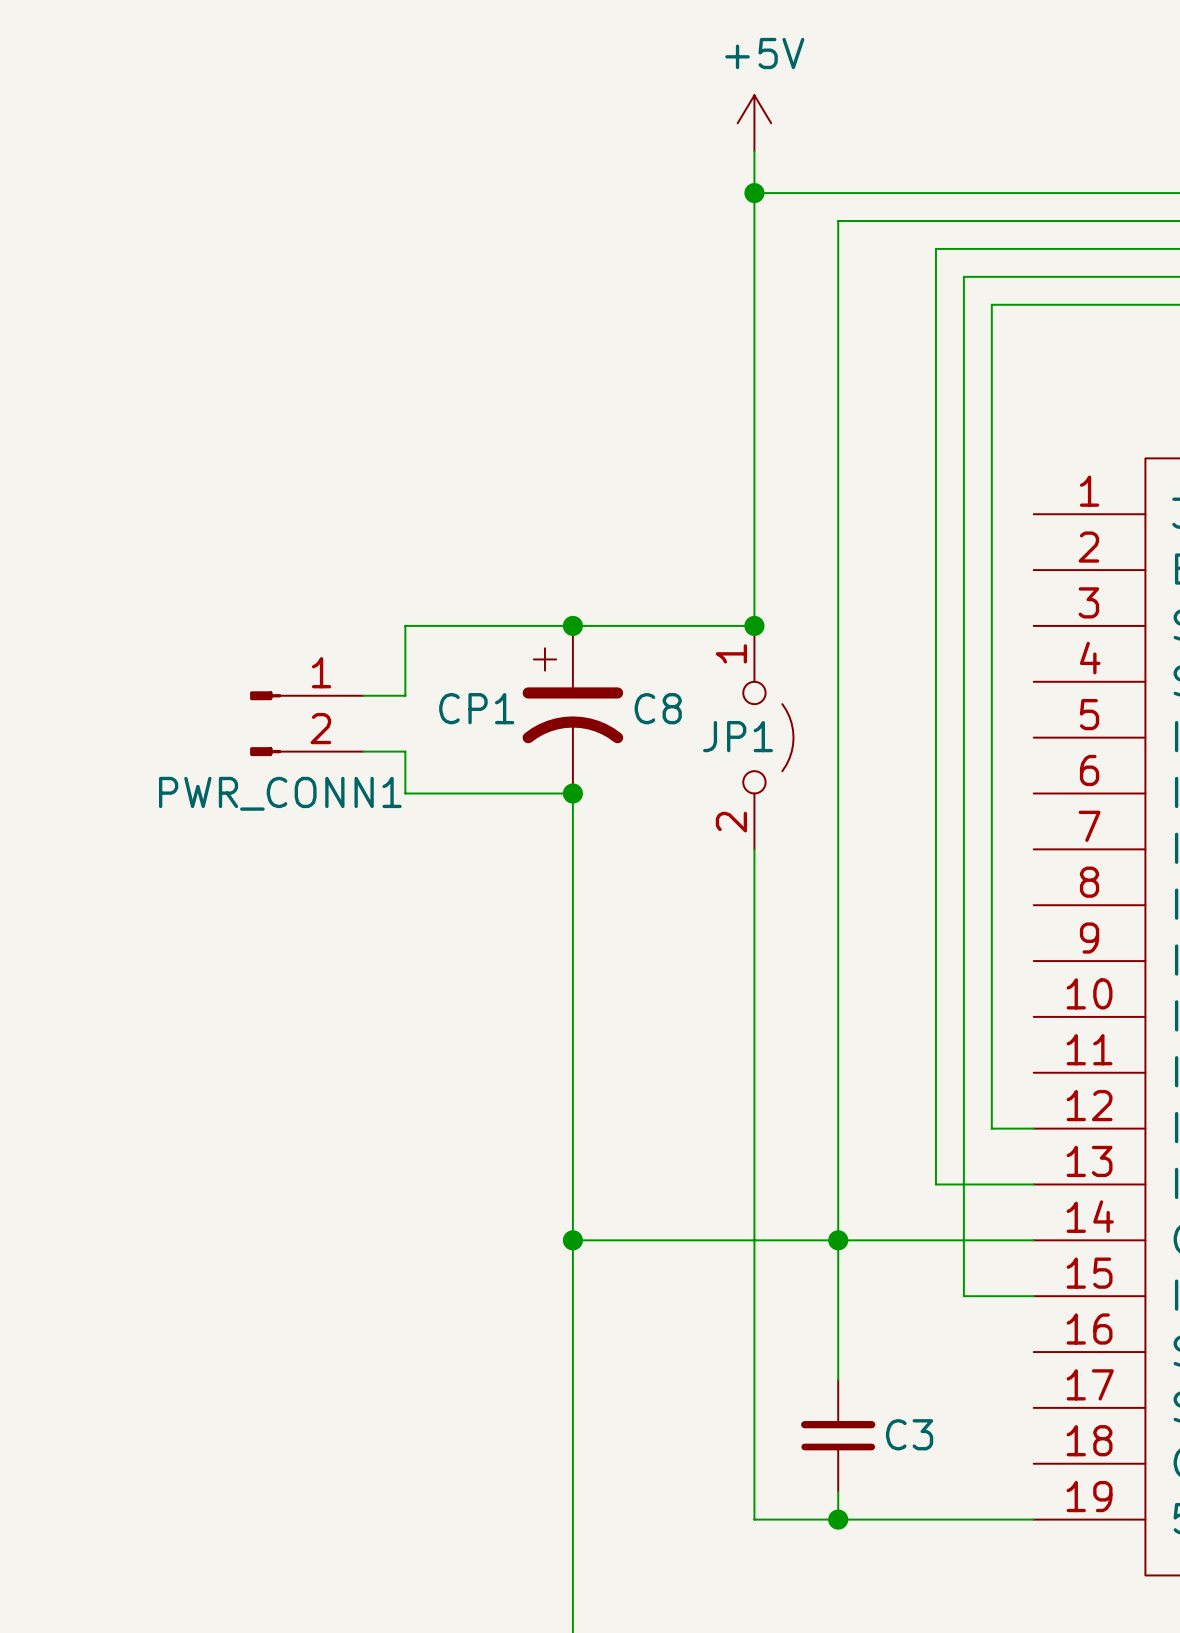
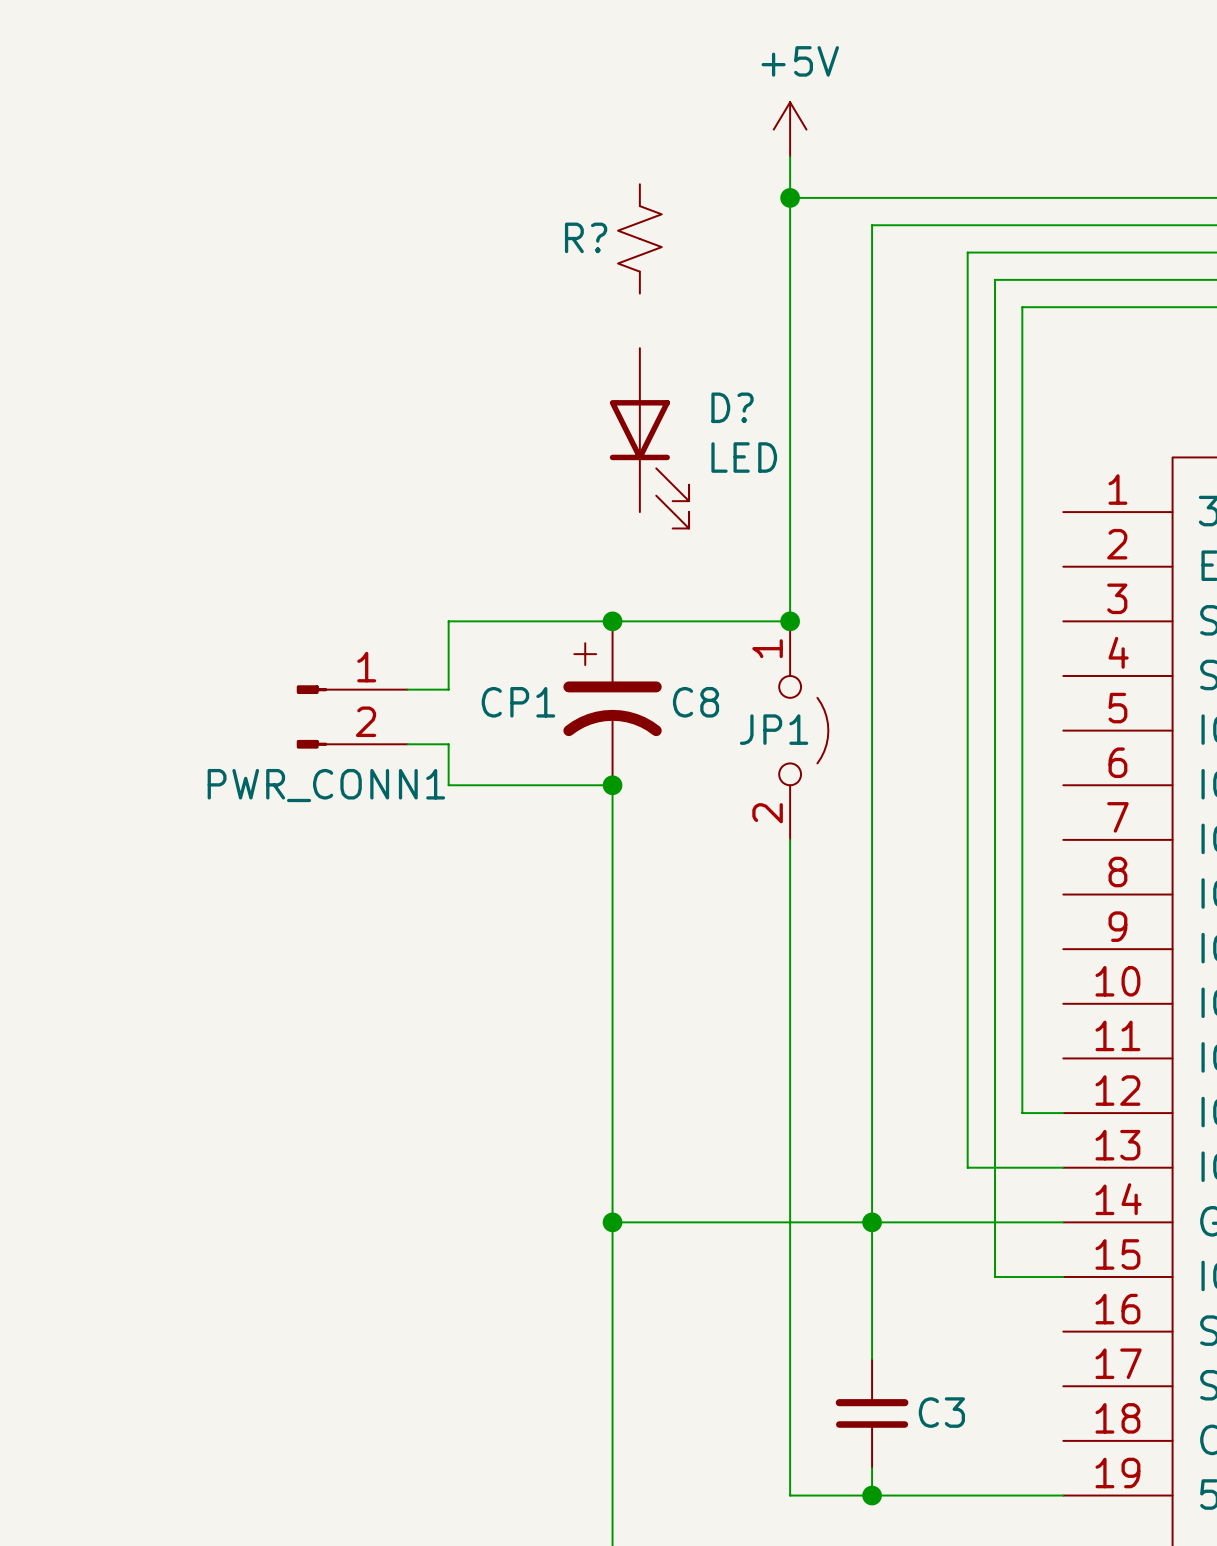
R?: none -> (639, 238)
D?: none -> LED (649, 438)

